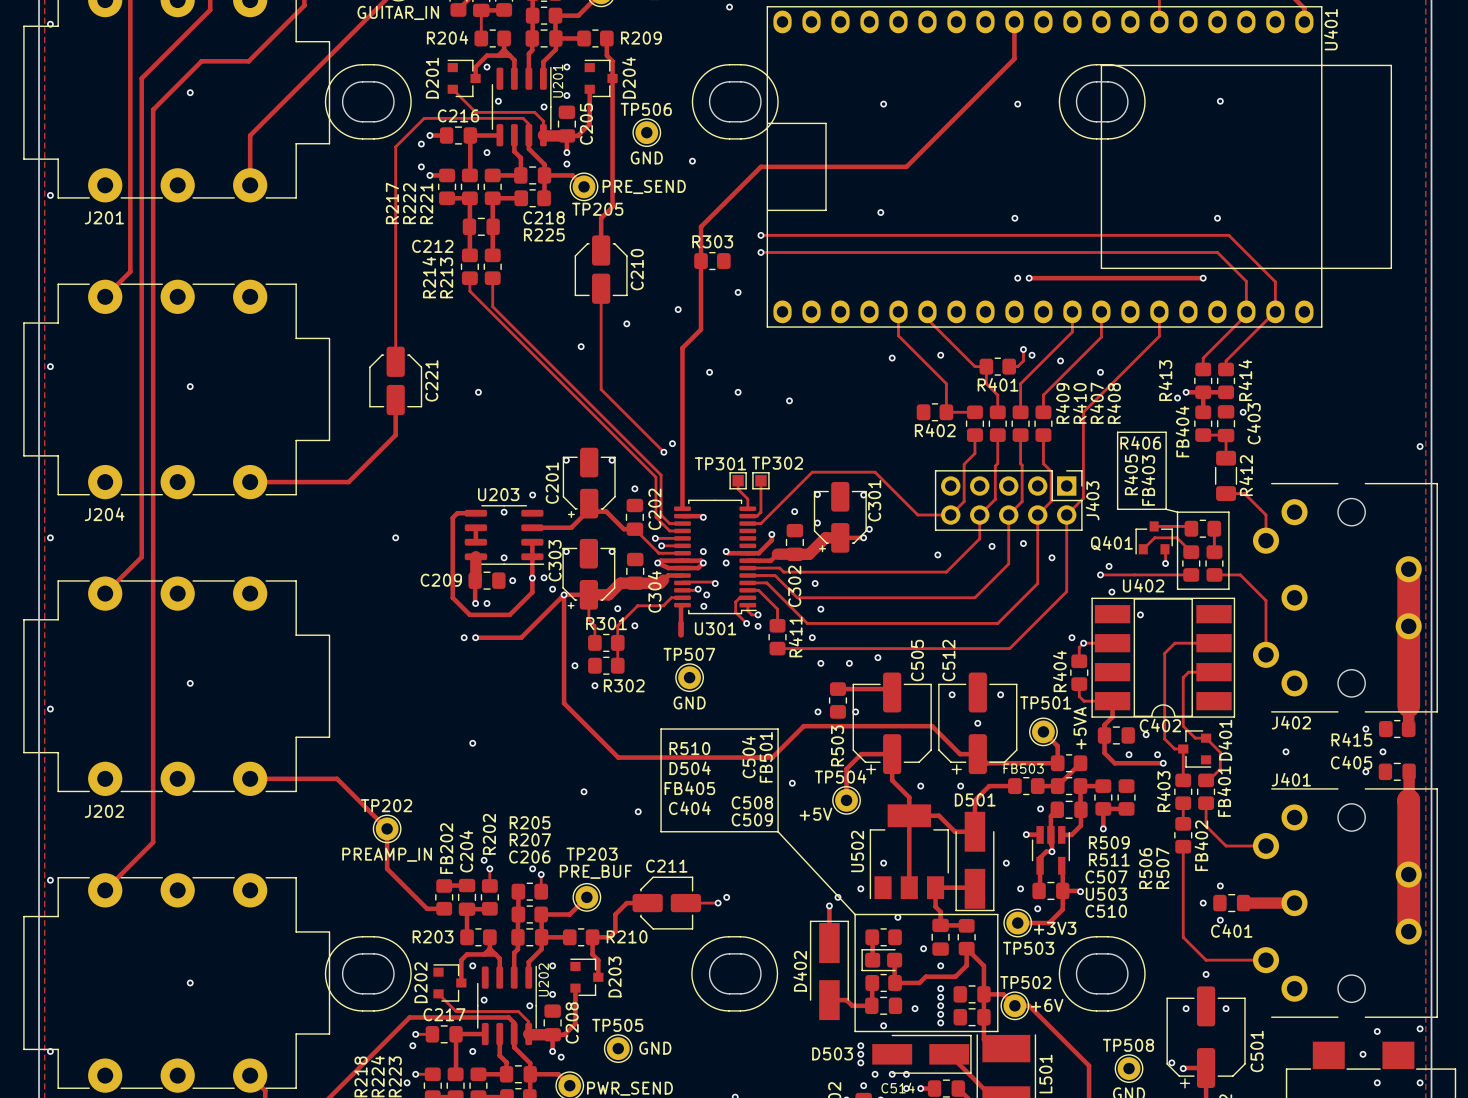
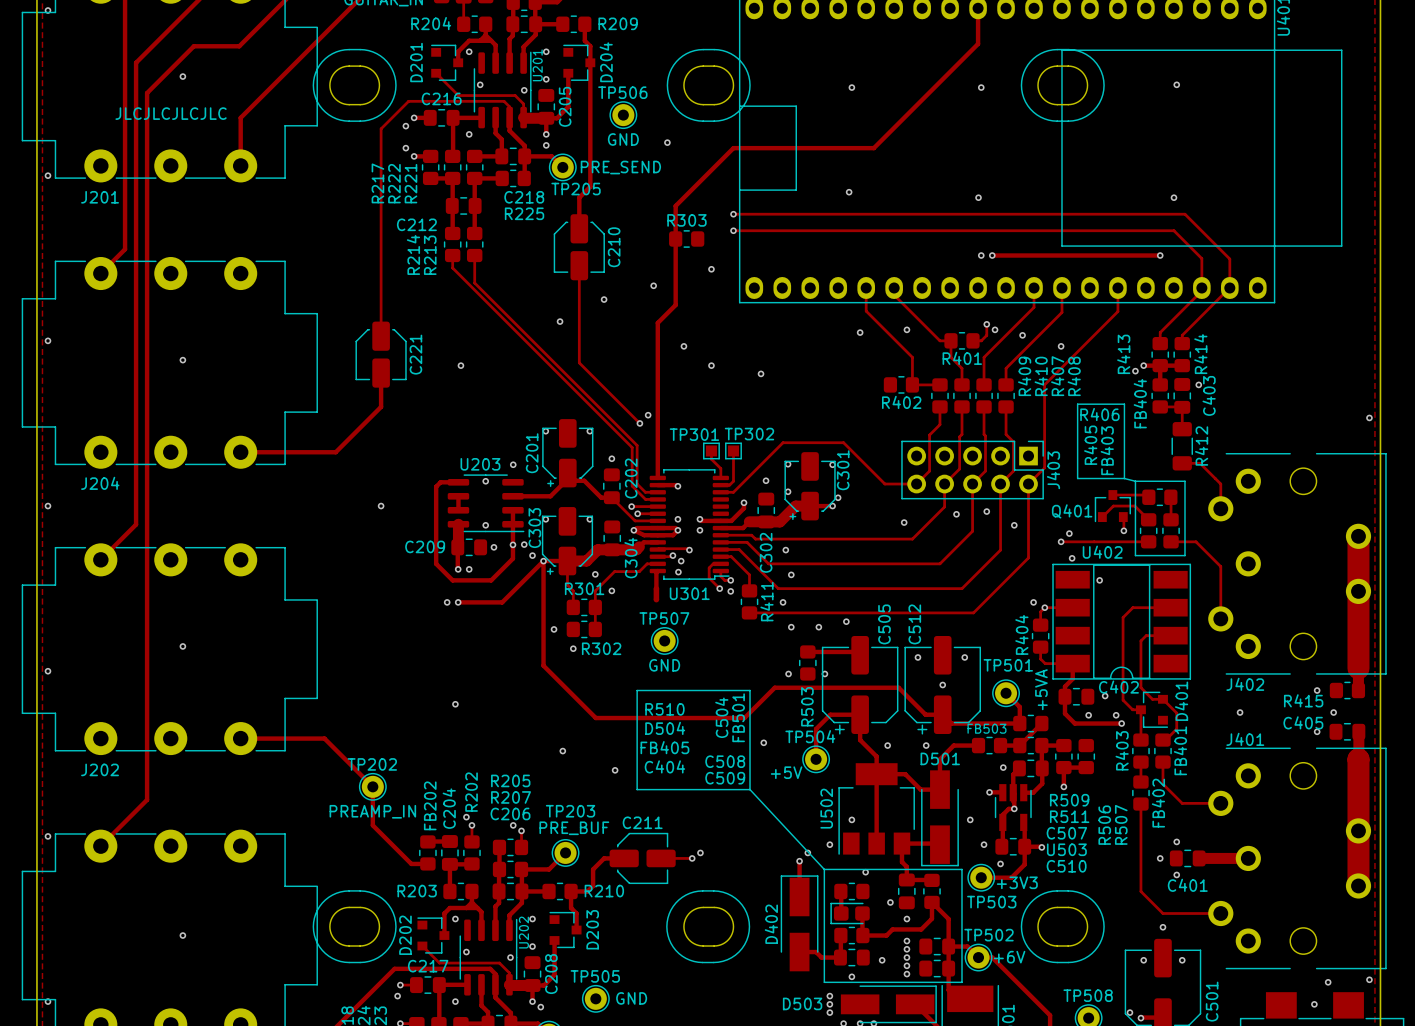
text: none -> JLCJLCJLCJLC (171, 113)

